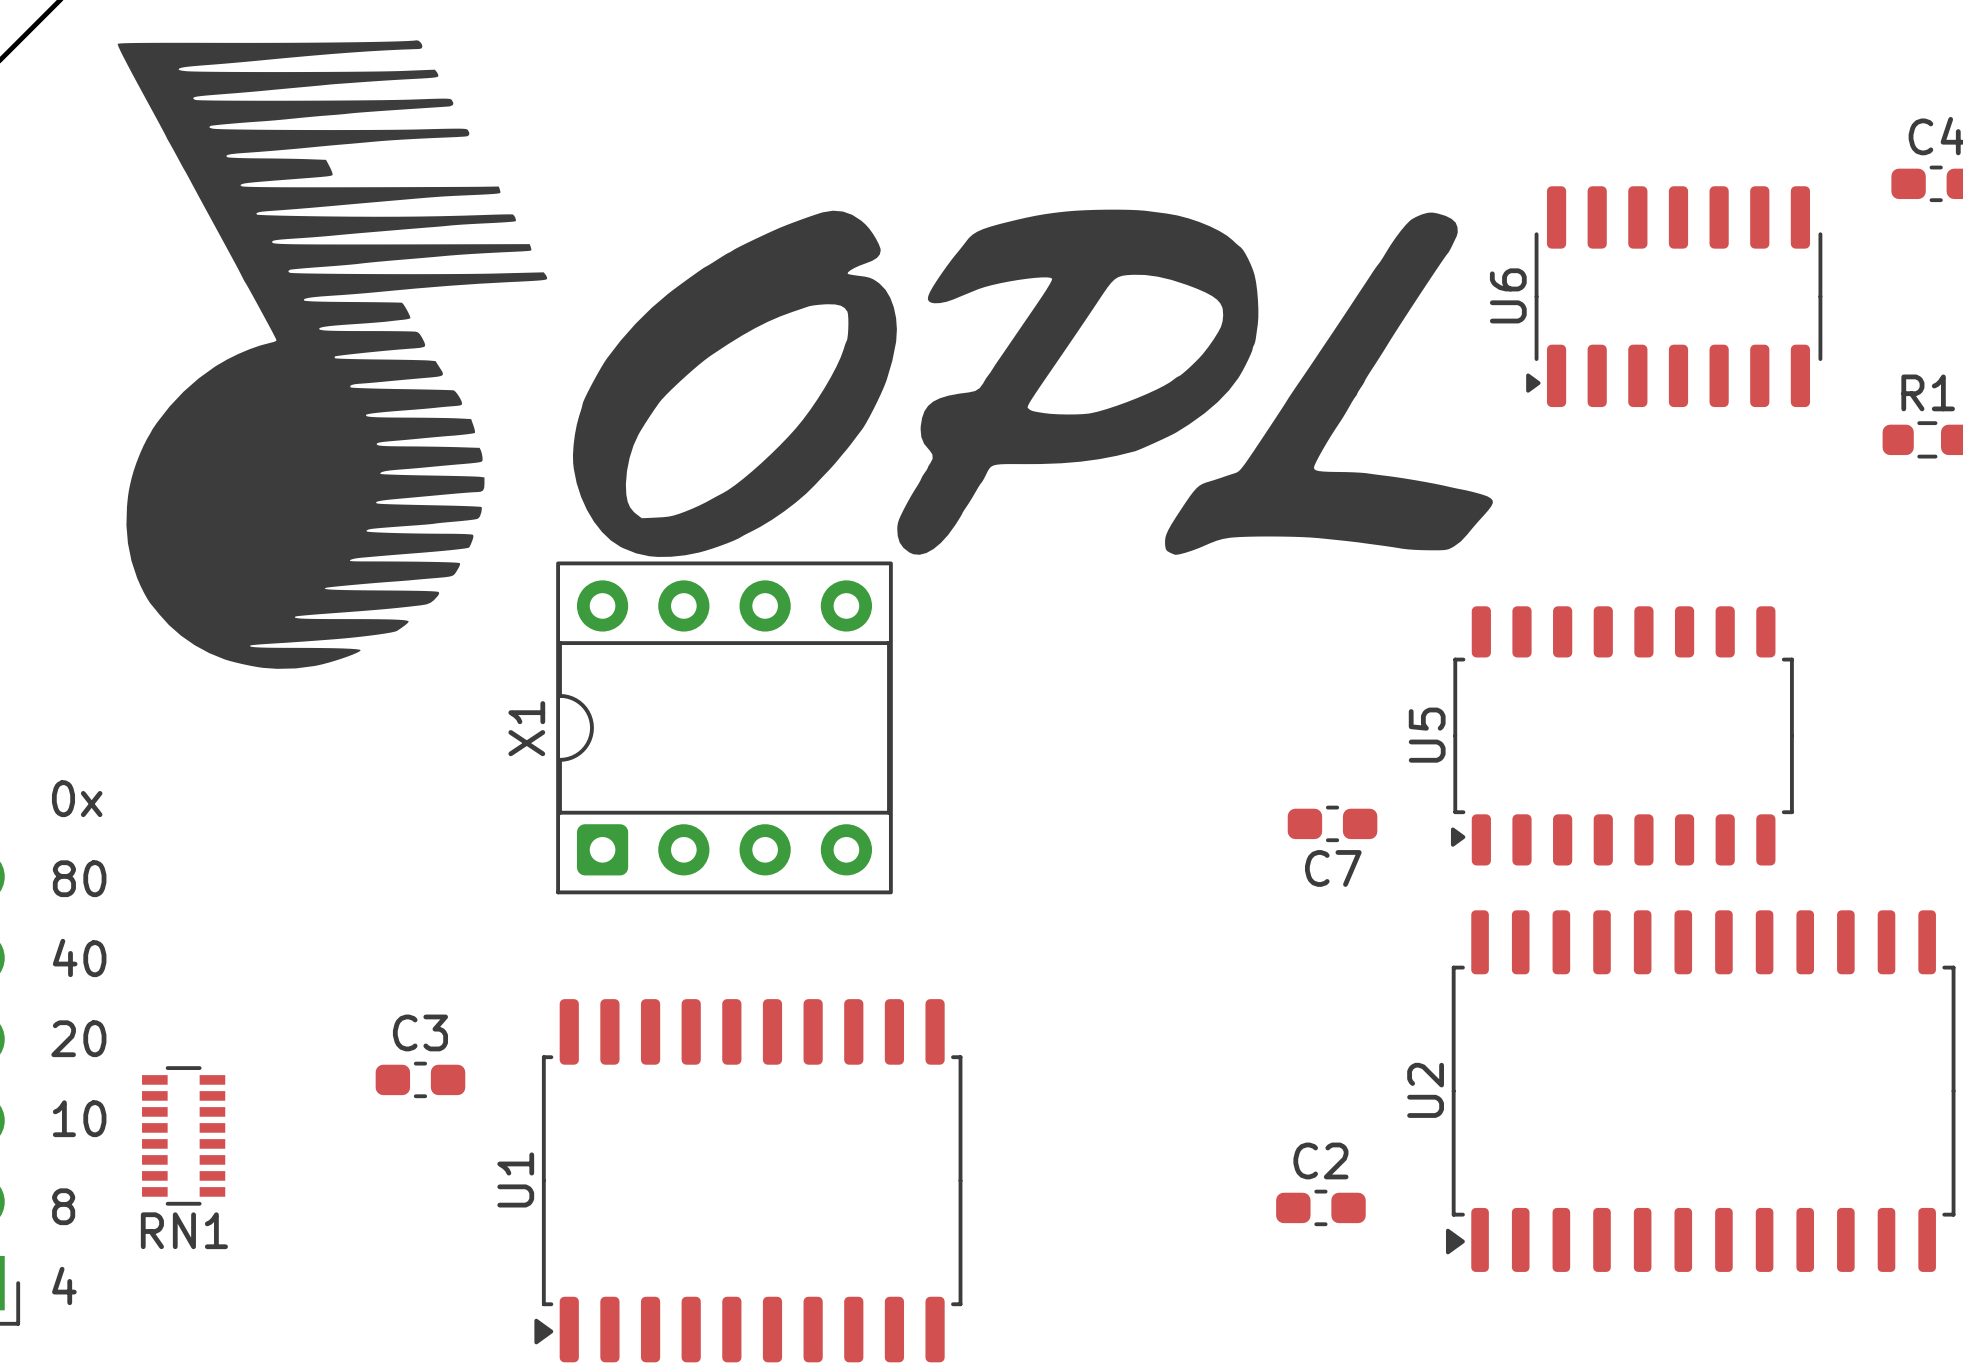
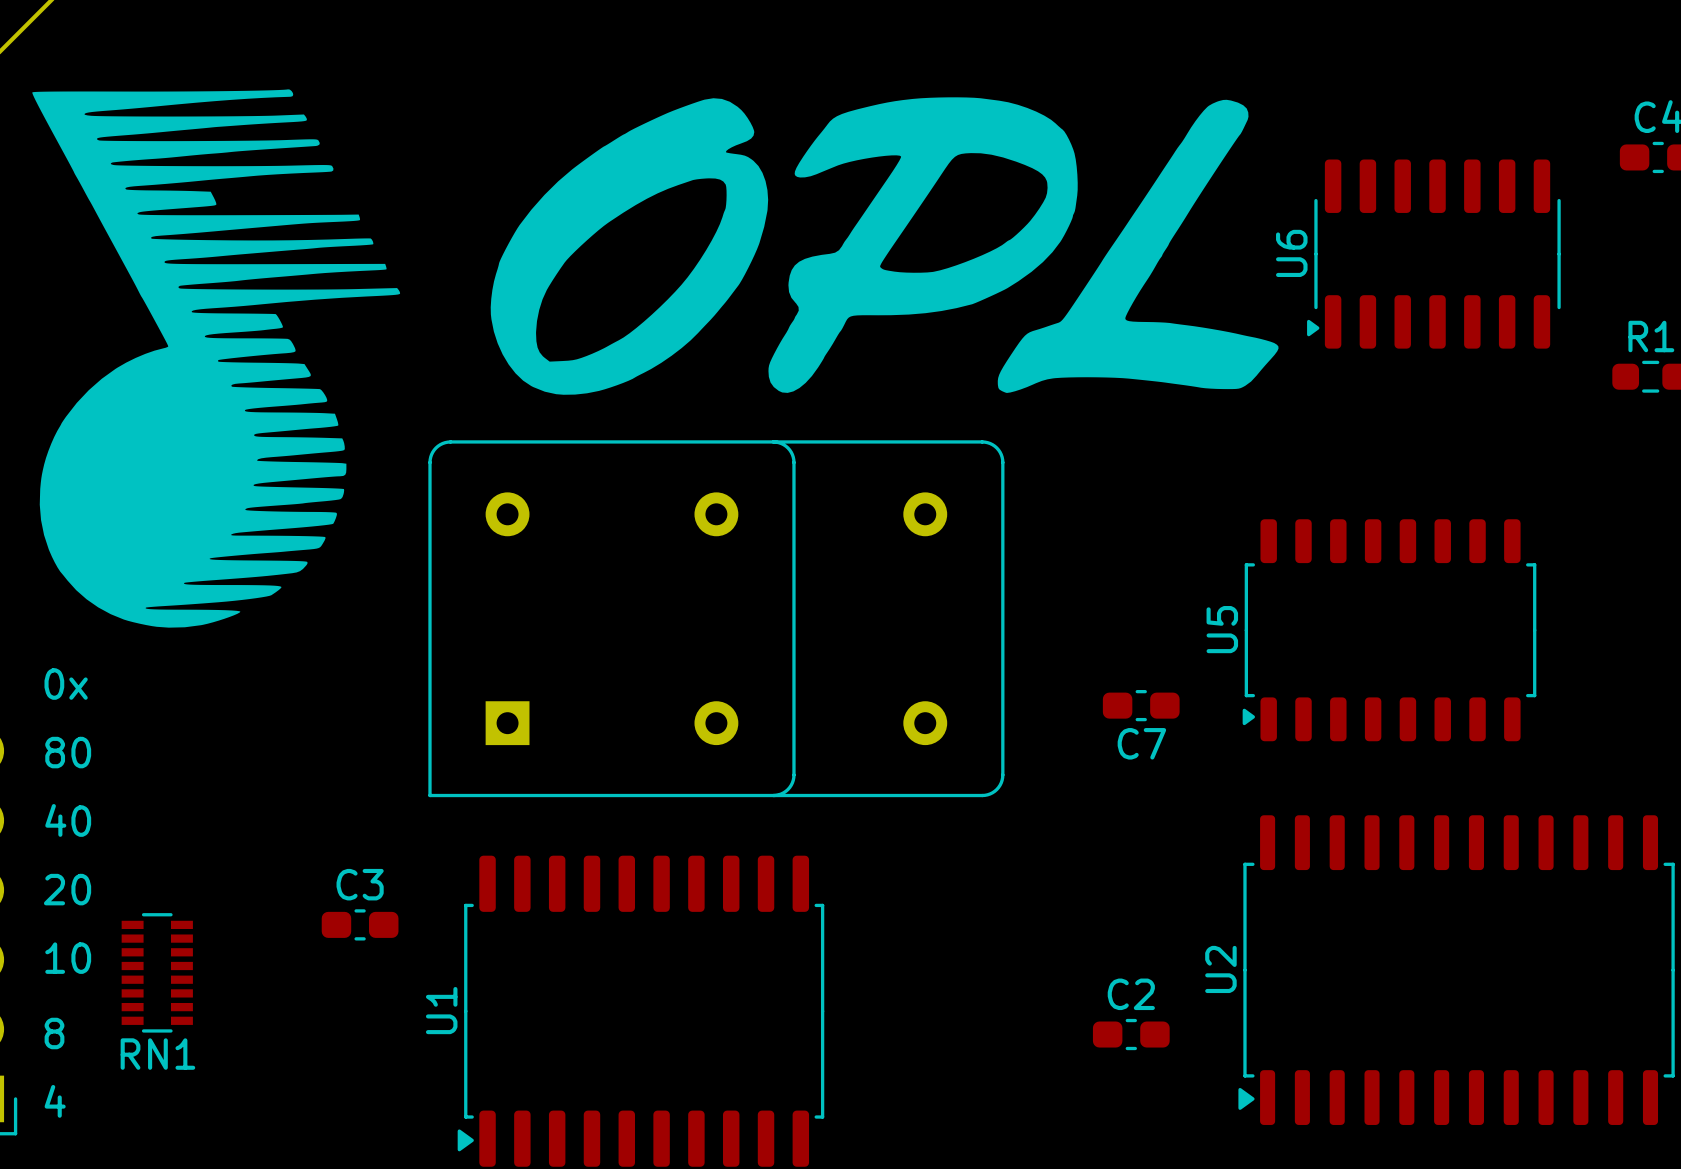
drawing position: (332, 354) -> (216, 358)
drawing position: (1032, 383) -> (884, 246)
part: none -> (716, 618)
X1: (724, 727) -> none
U2 position: (1700, 1091) -> (1456, 970)

